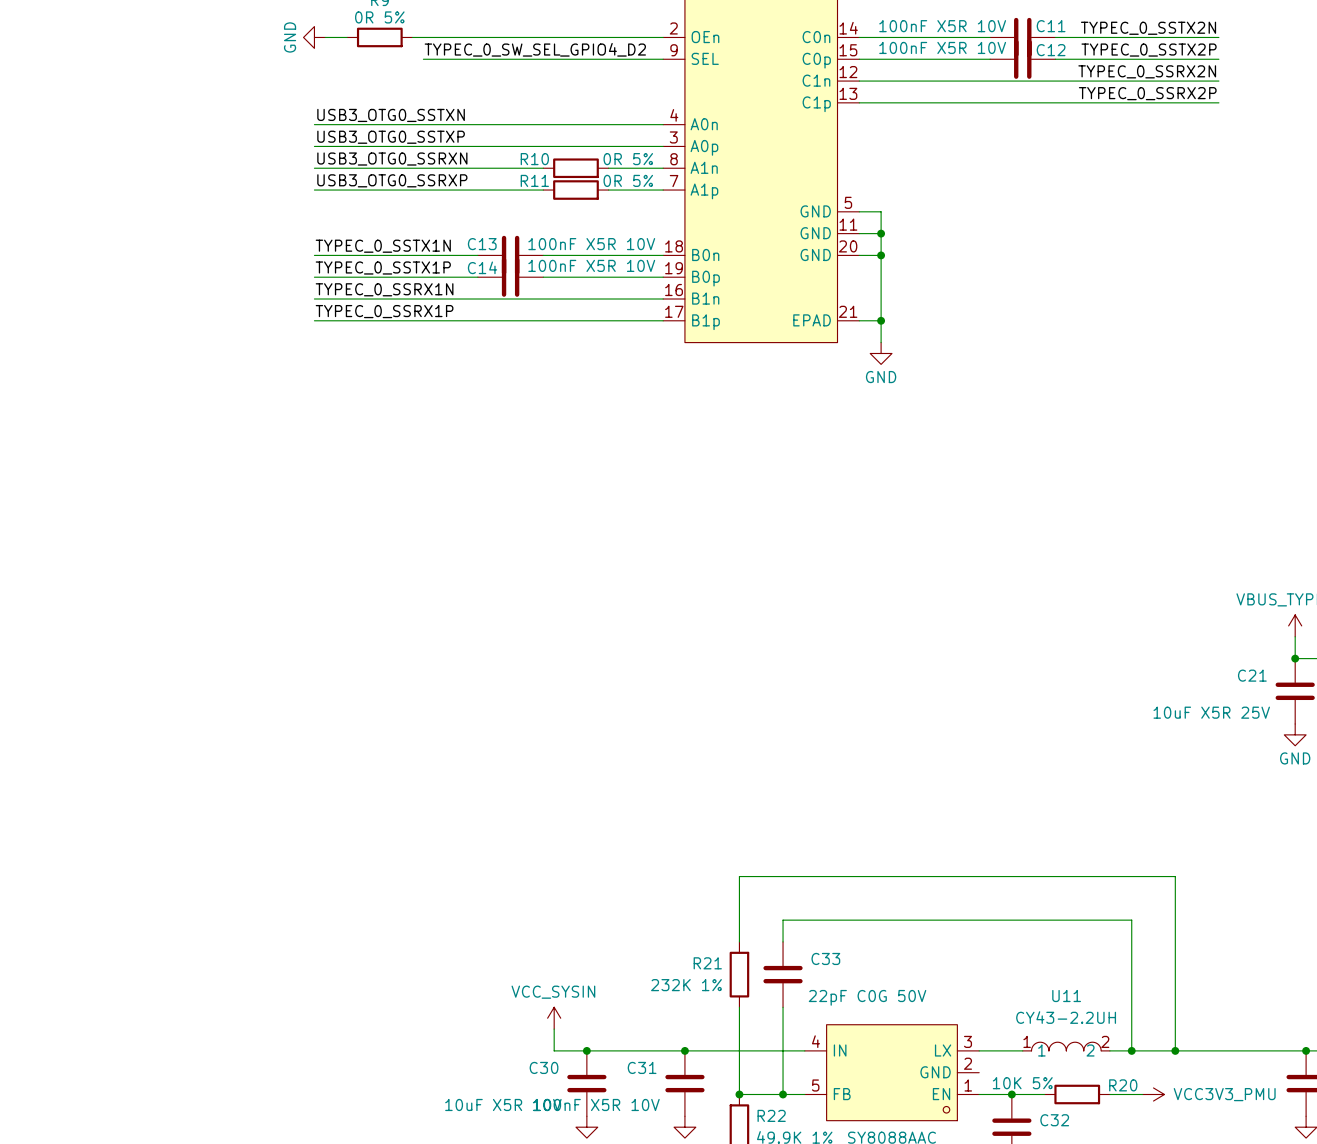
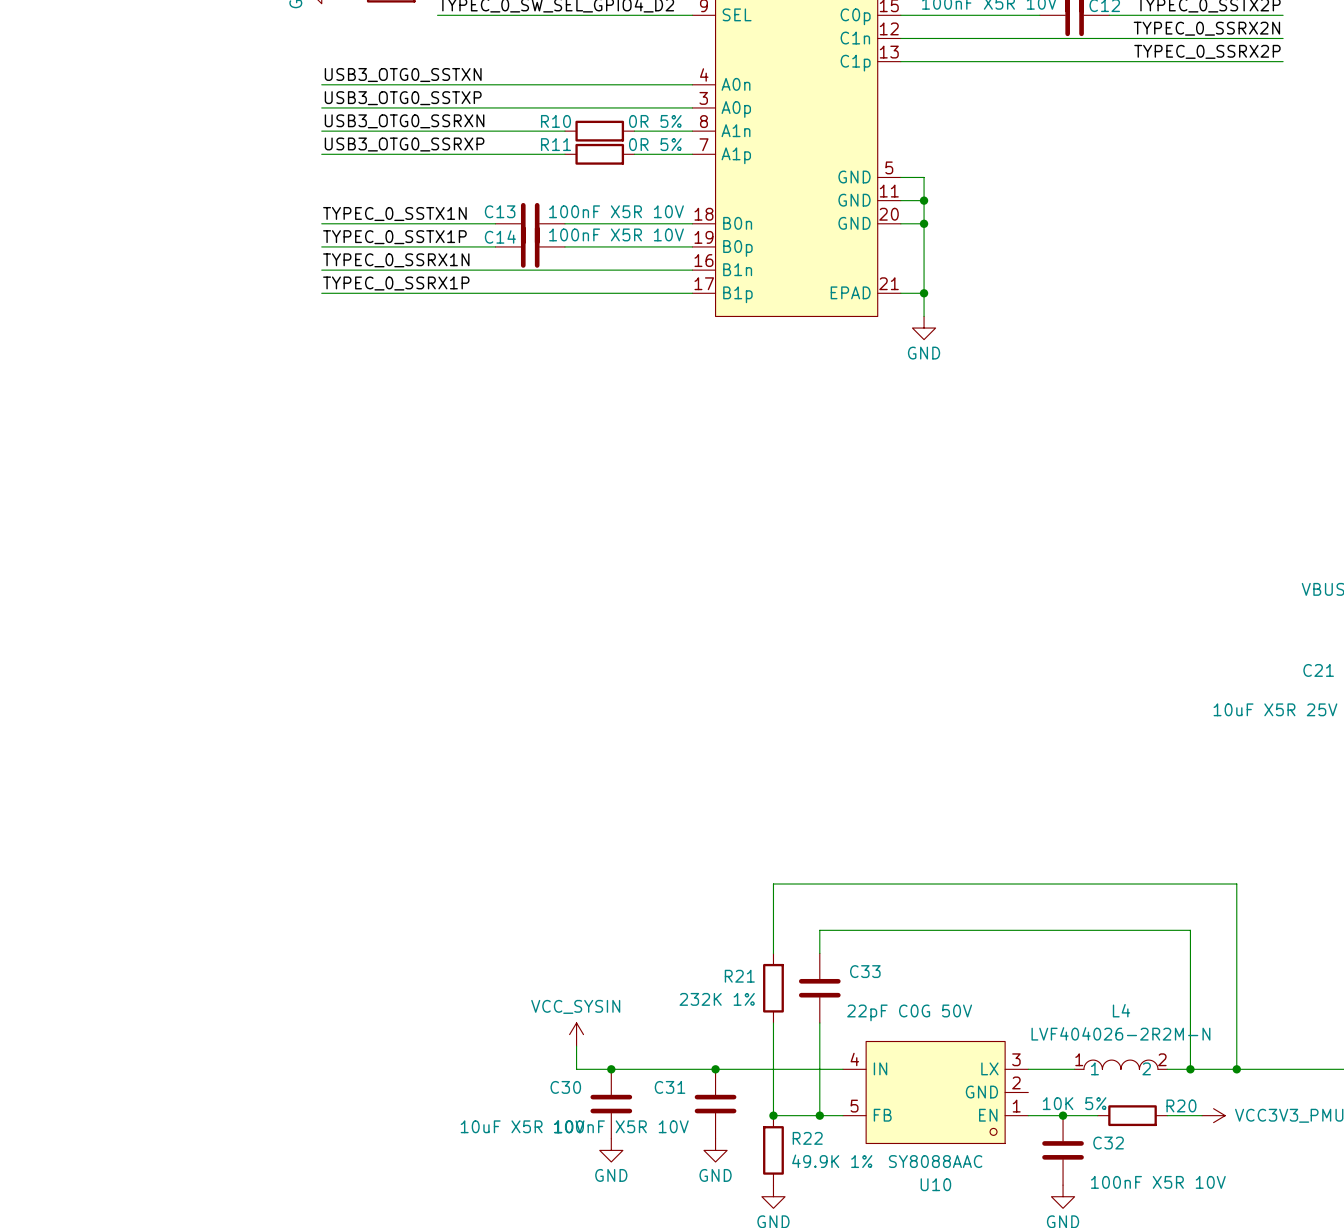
U11 name: U11 (1066, 996) -> L4 (1121, 1010)
U11 value: CY43-2.2UH (1066, 1017) -> LVF404026-2R2M-N (1120, 1033)

